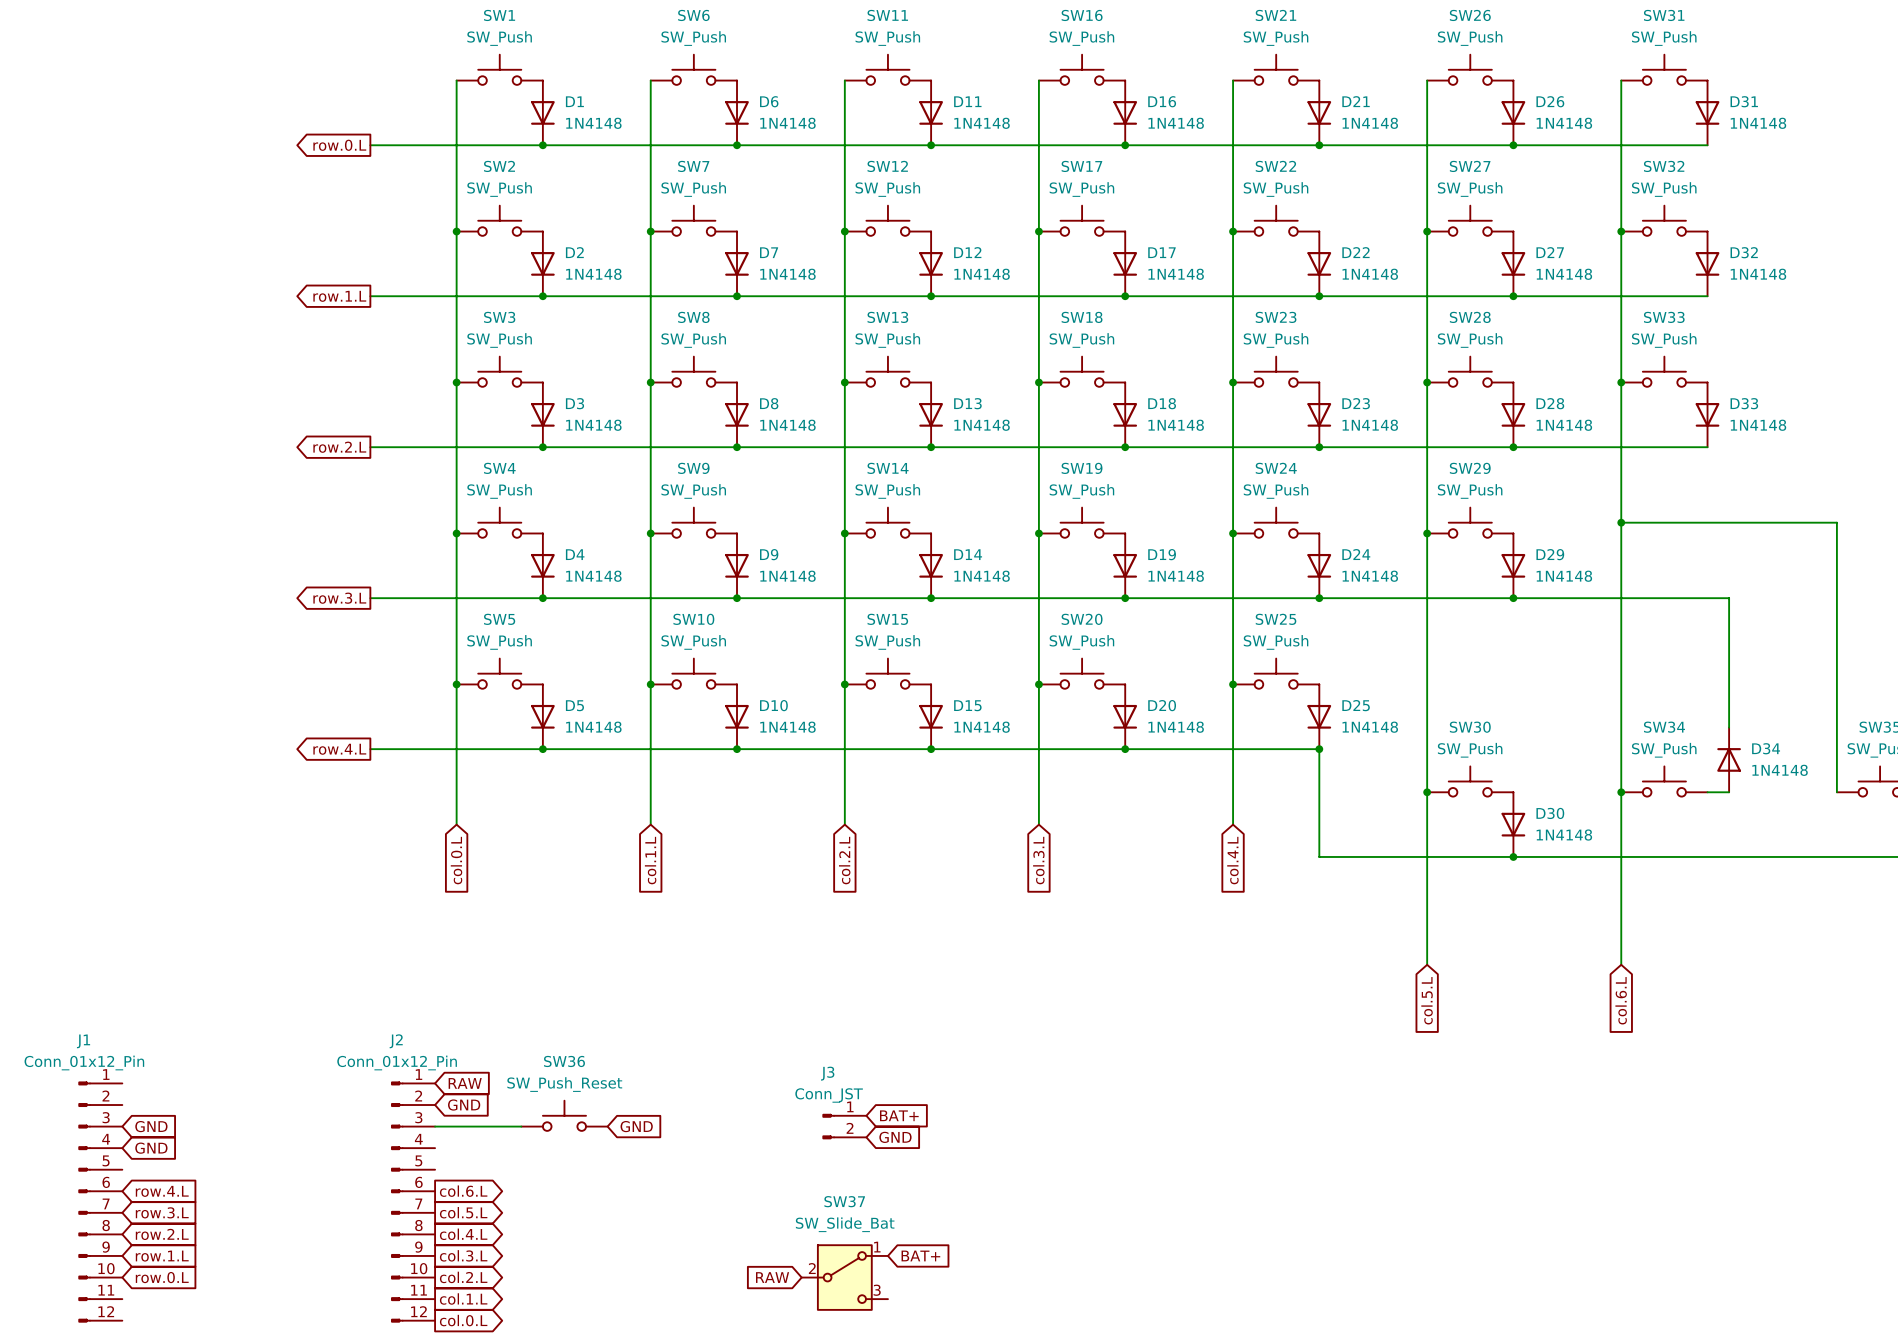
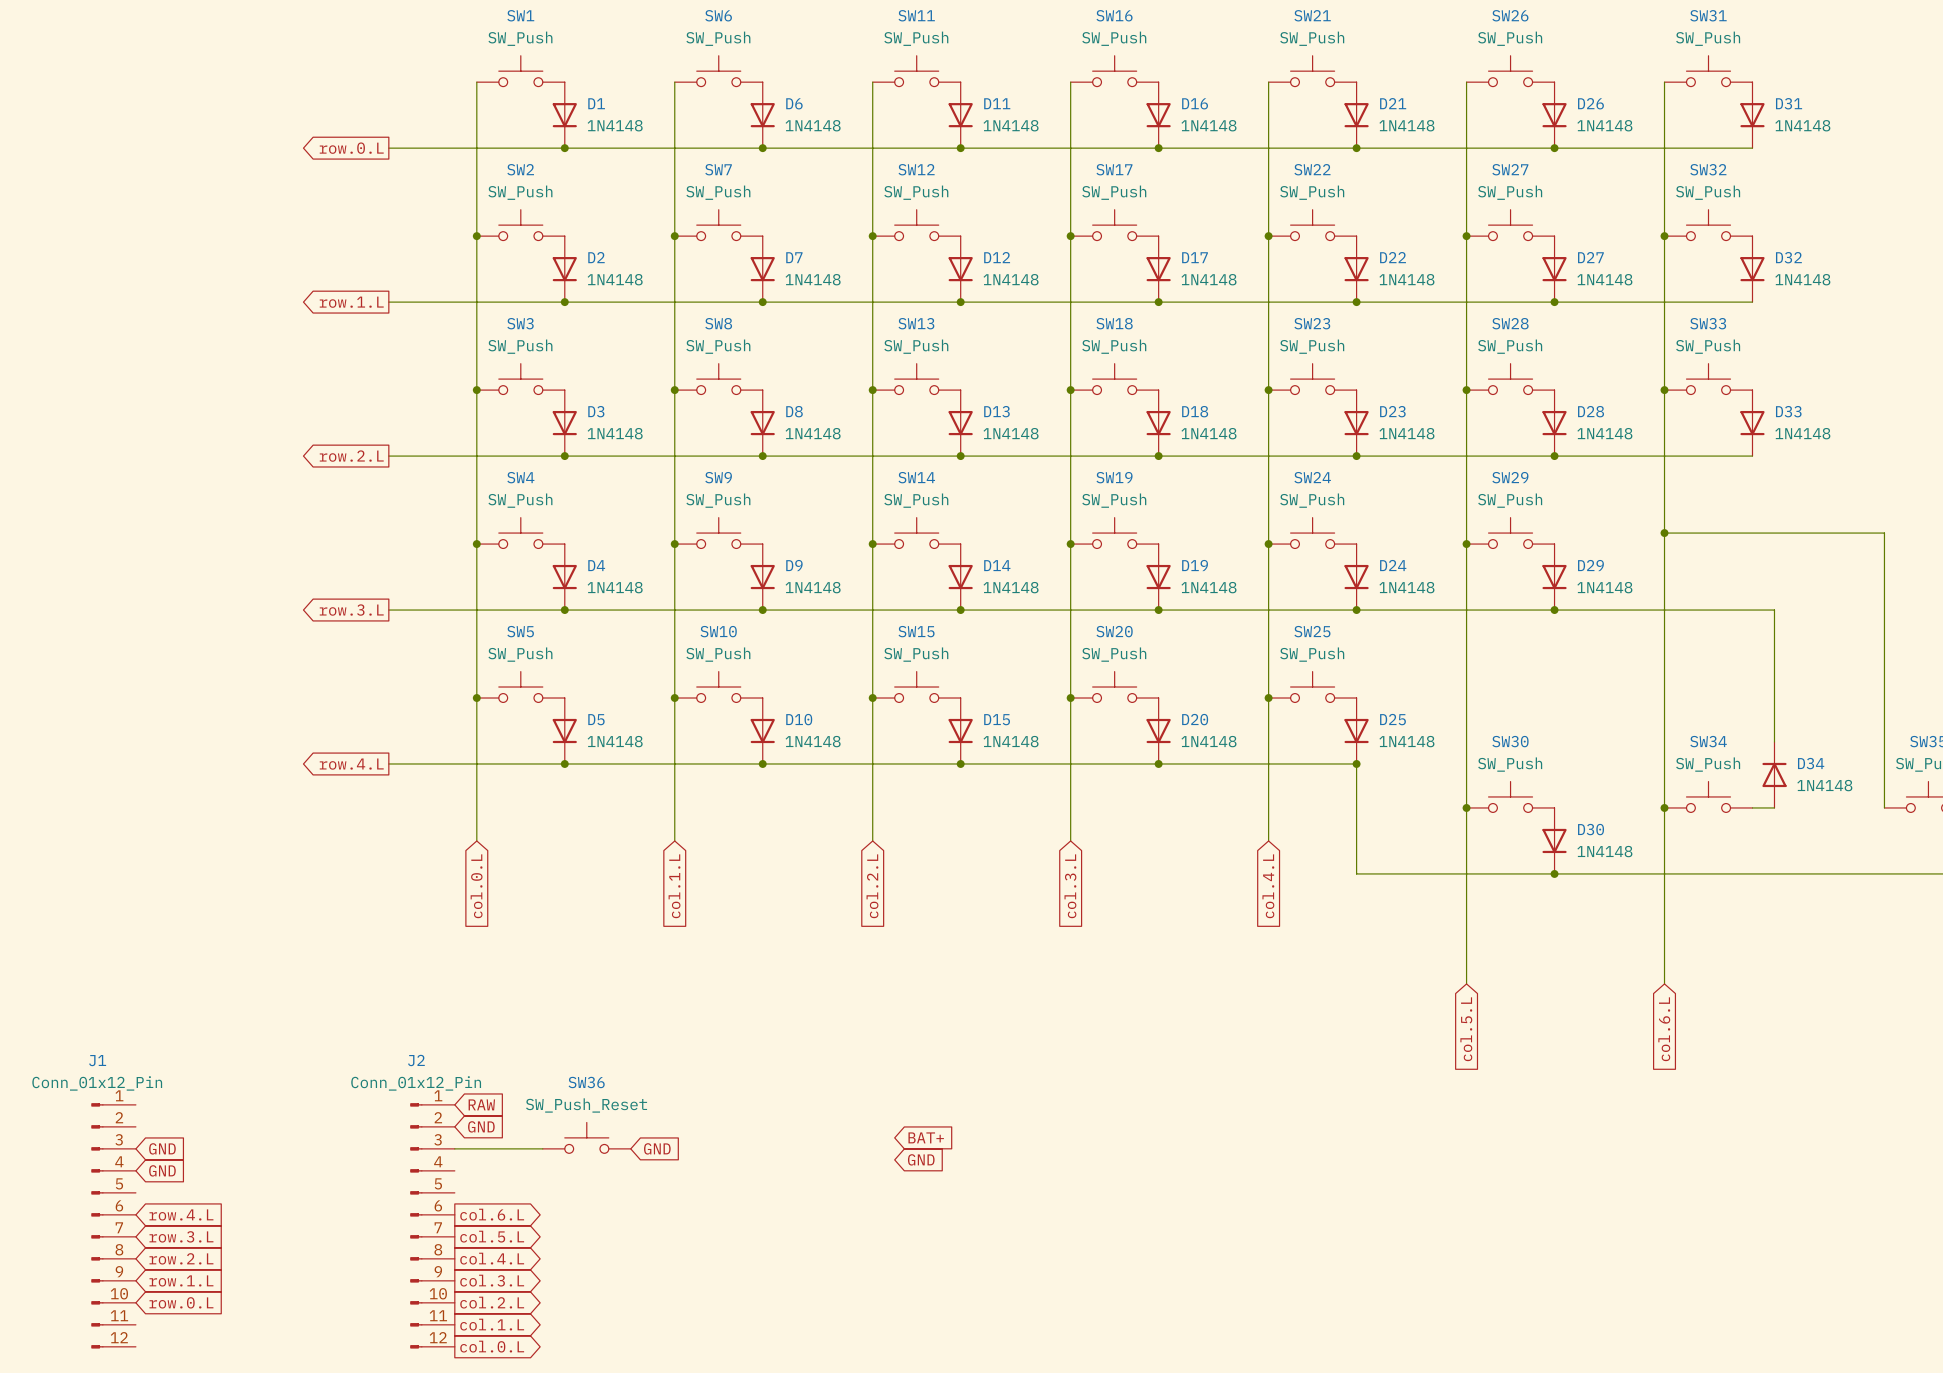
J3: Conn_JST (844, 1126) -> none
global label: BAT+ (920, 1255) -> none
global label: RAW (772, 1277) -> none
SW37: SW_Slide_Bat (844, 1277) -> none

